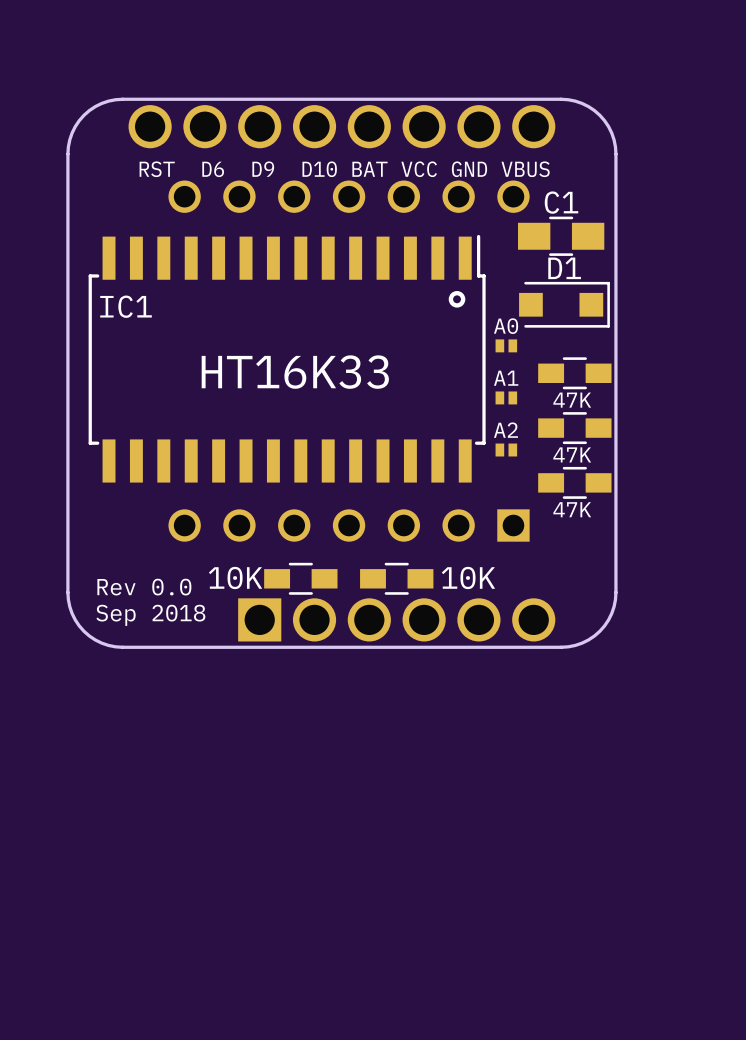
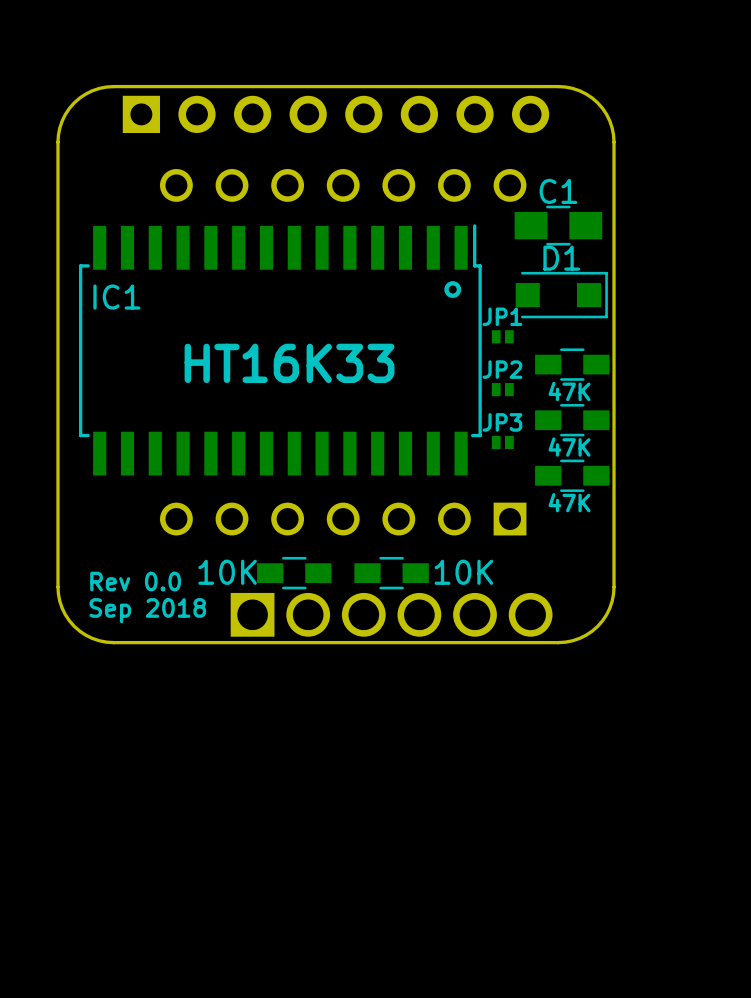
part footprint: [128, 105, 556, 149] -> [122, 95, 550, 133]
A0 name: A0 (506, 326) -> JP1 (502, 316)
A1 name: A1 (506, 378) -> JP2 (502, 369)
A2 name: A2 (505, 430) -> JP3 (502, 422)

